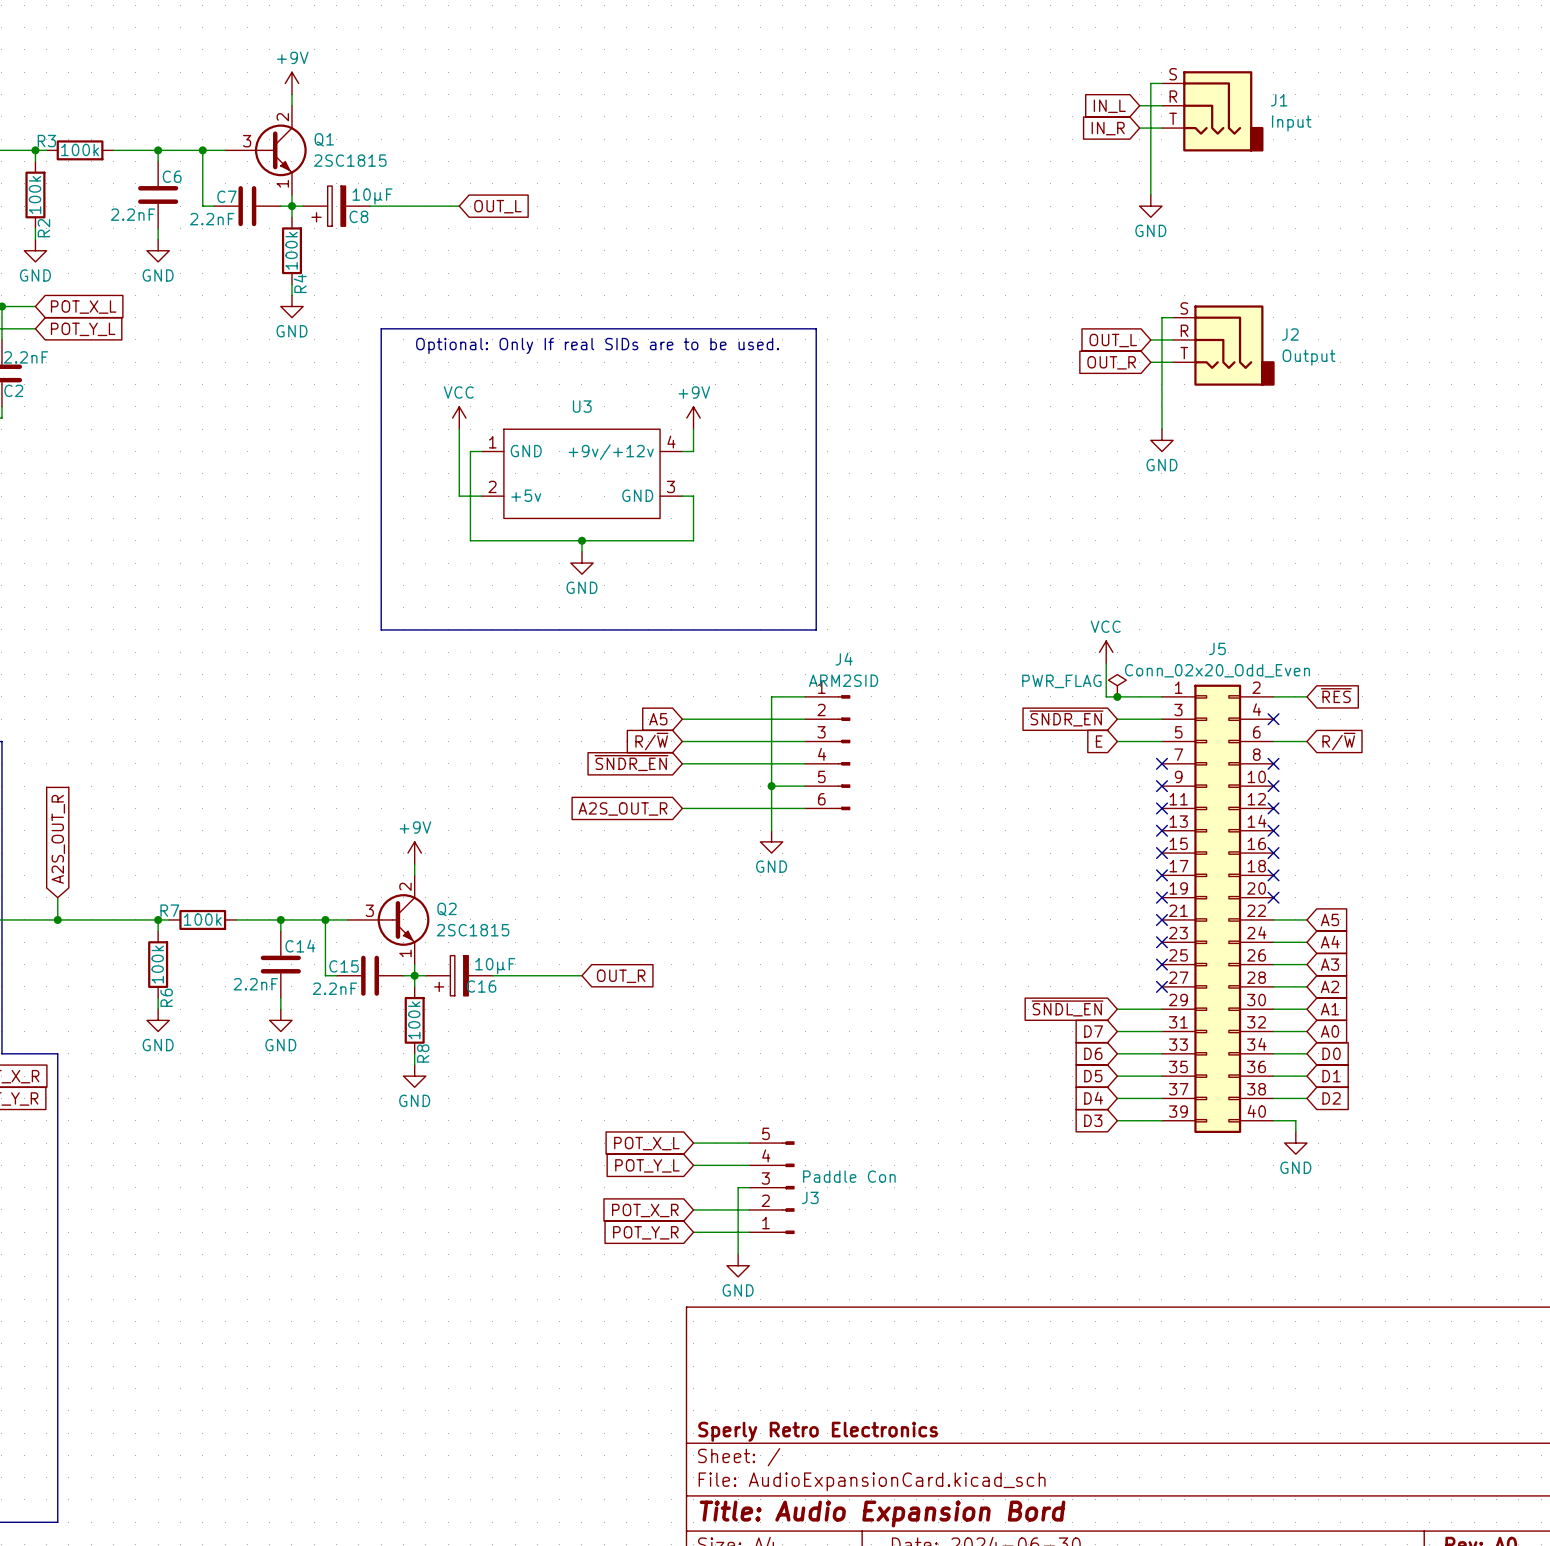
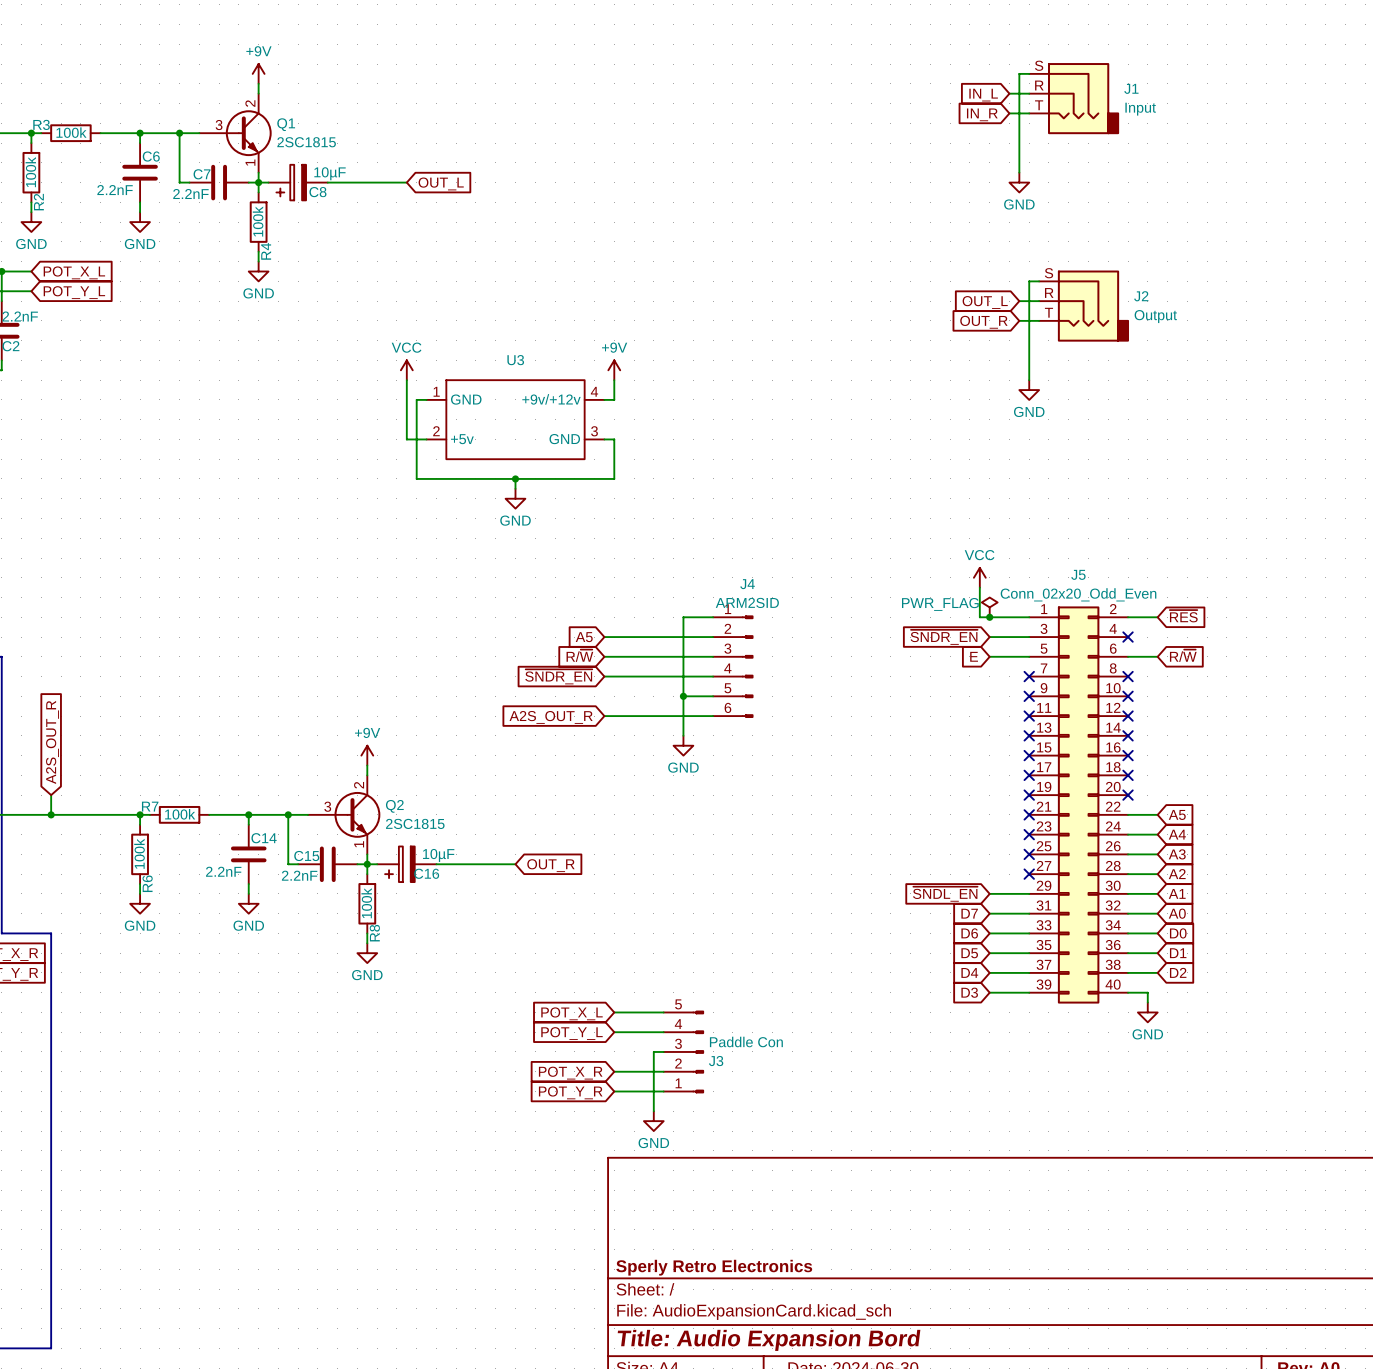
line: (381, 328) (816, 328) (816, 629) (381, 629) (381, 328) -> none
text: Optional: Only If real SIDs are to be used. (597, 345) -> none

